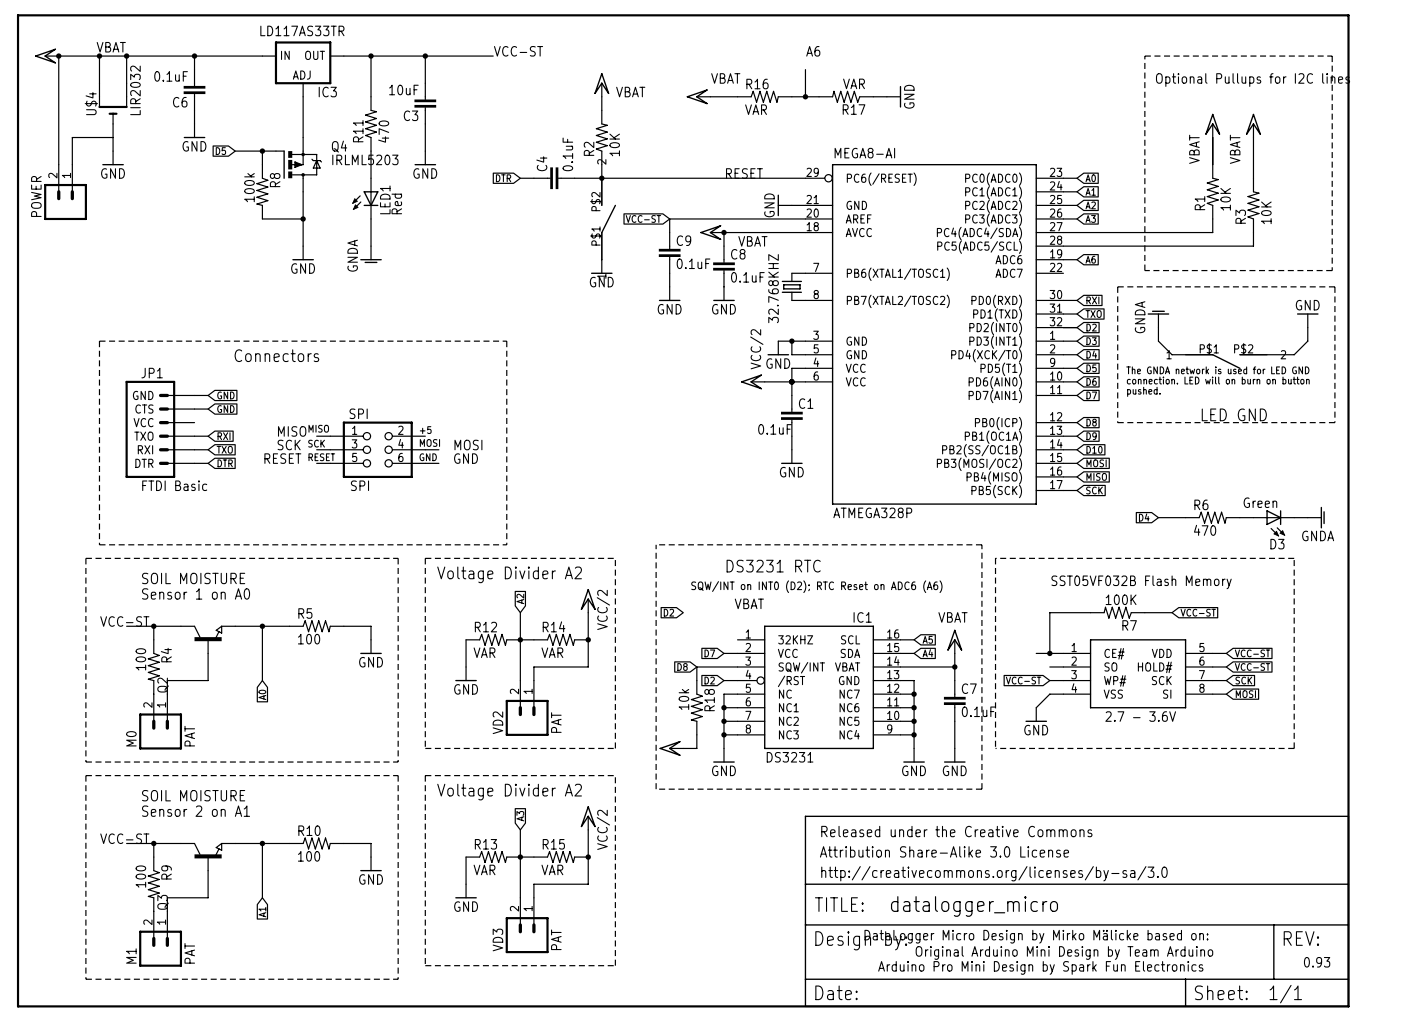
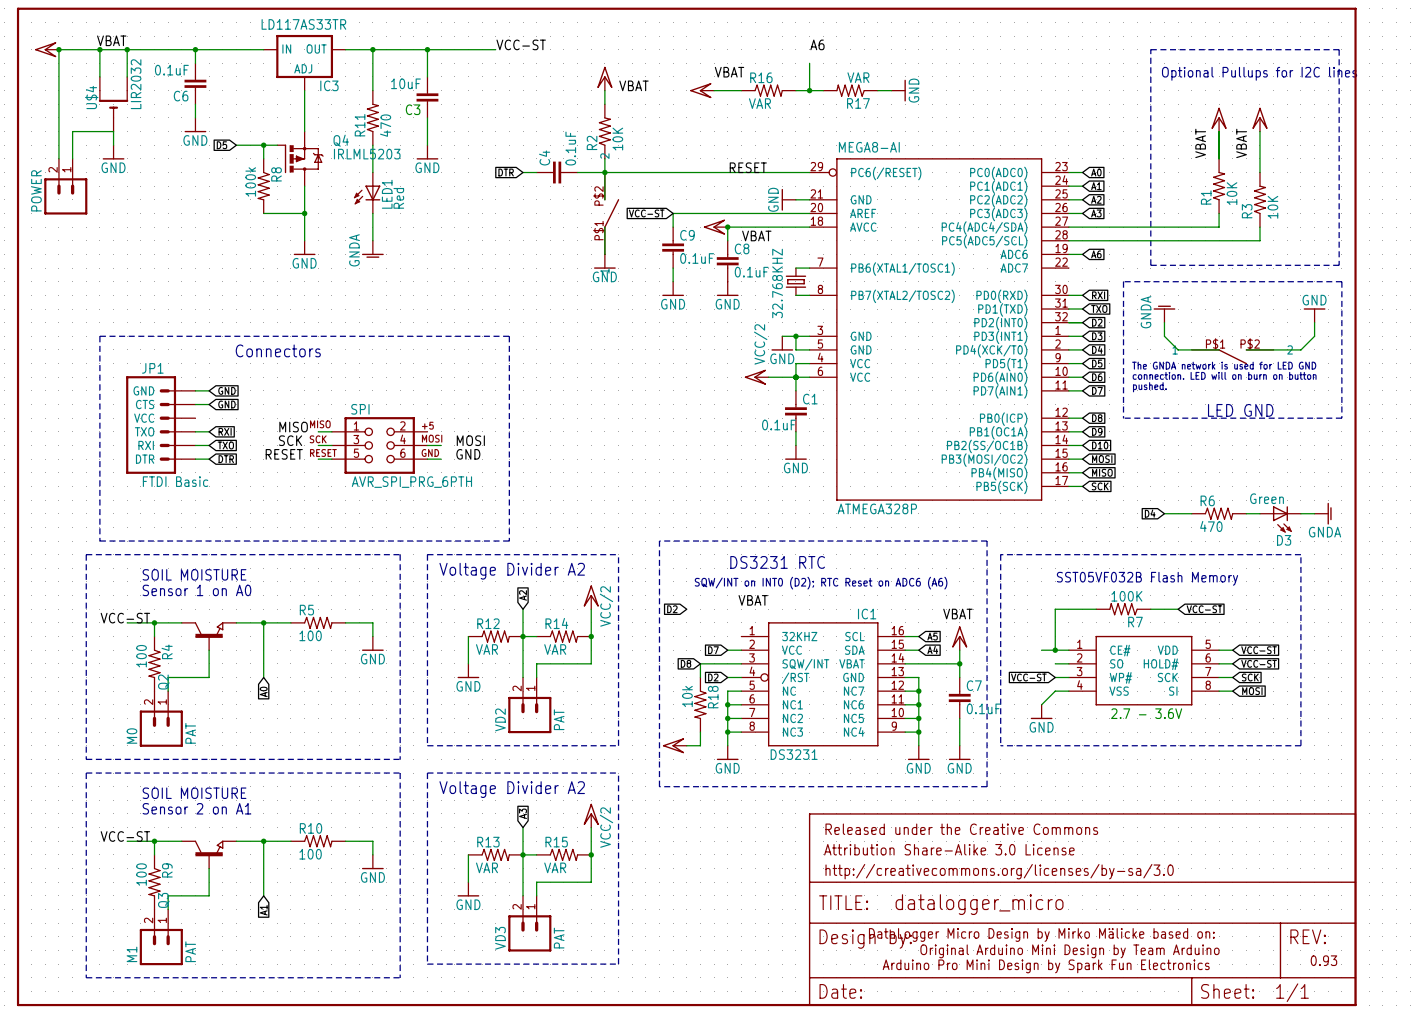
SPI value: SPI (359, 485) -> AVR_SPI_PRG_6PTH (411, 482)

